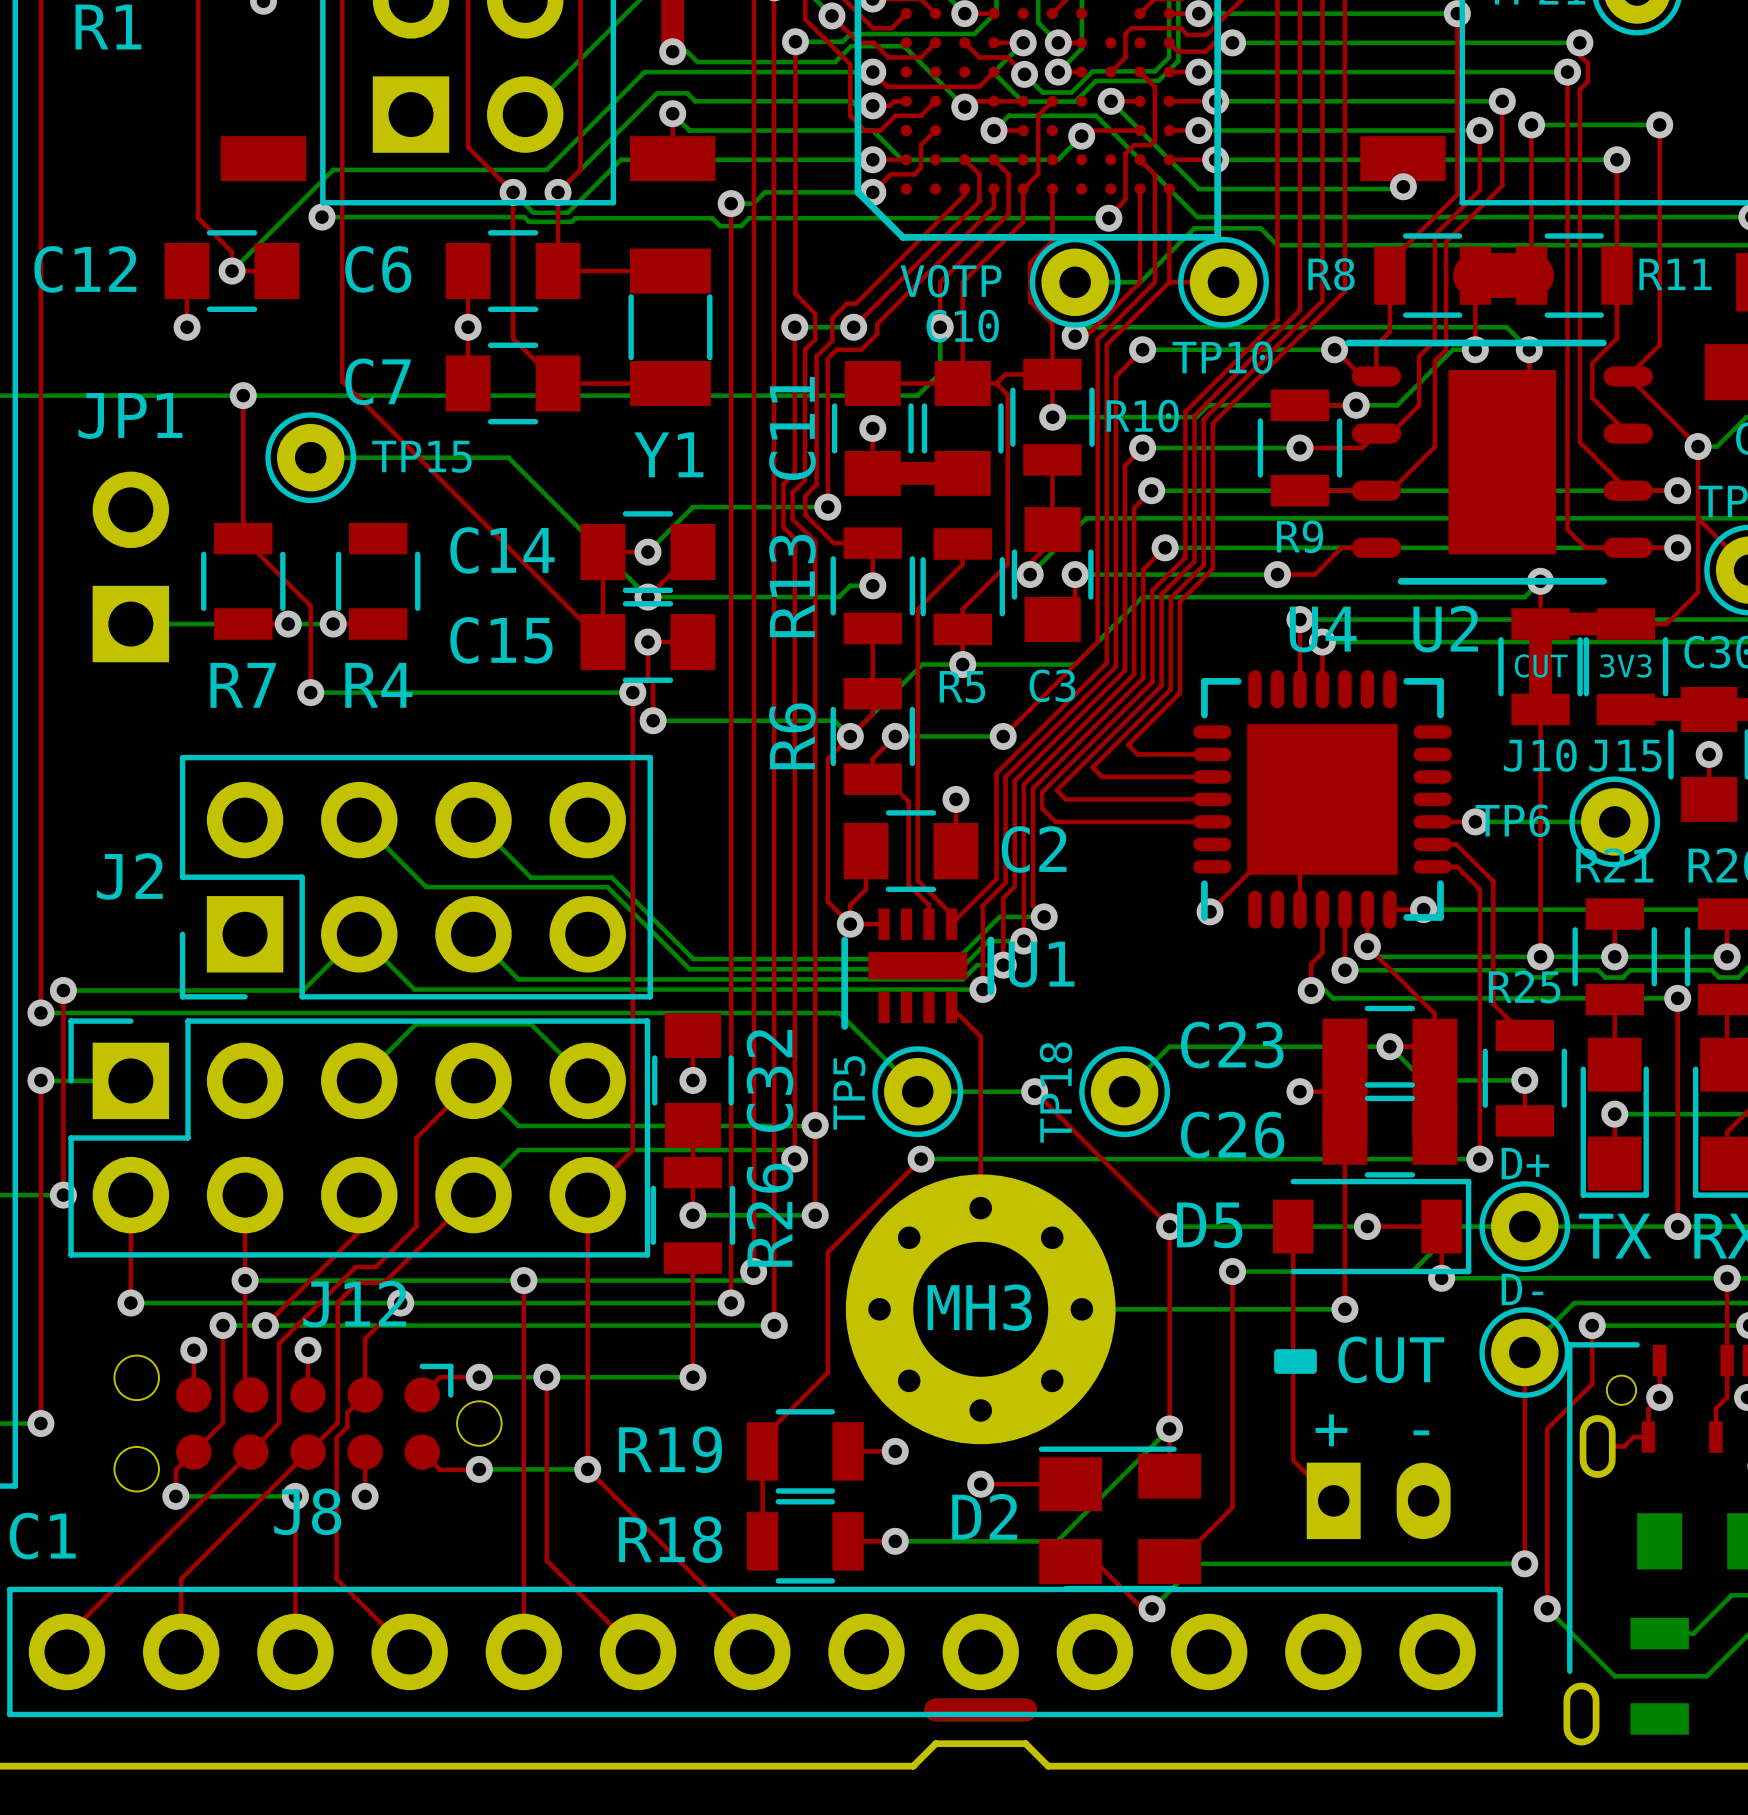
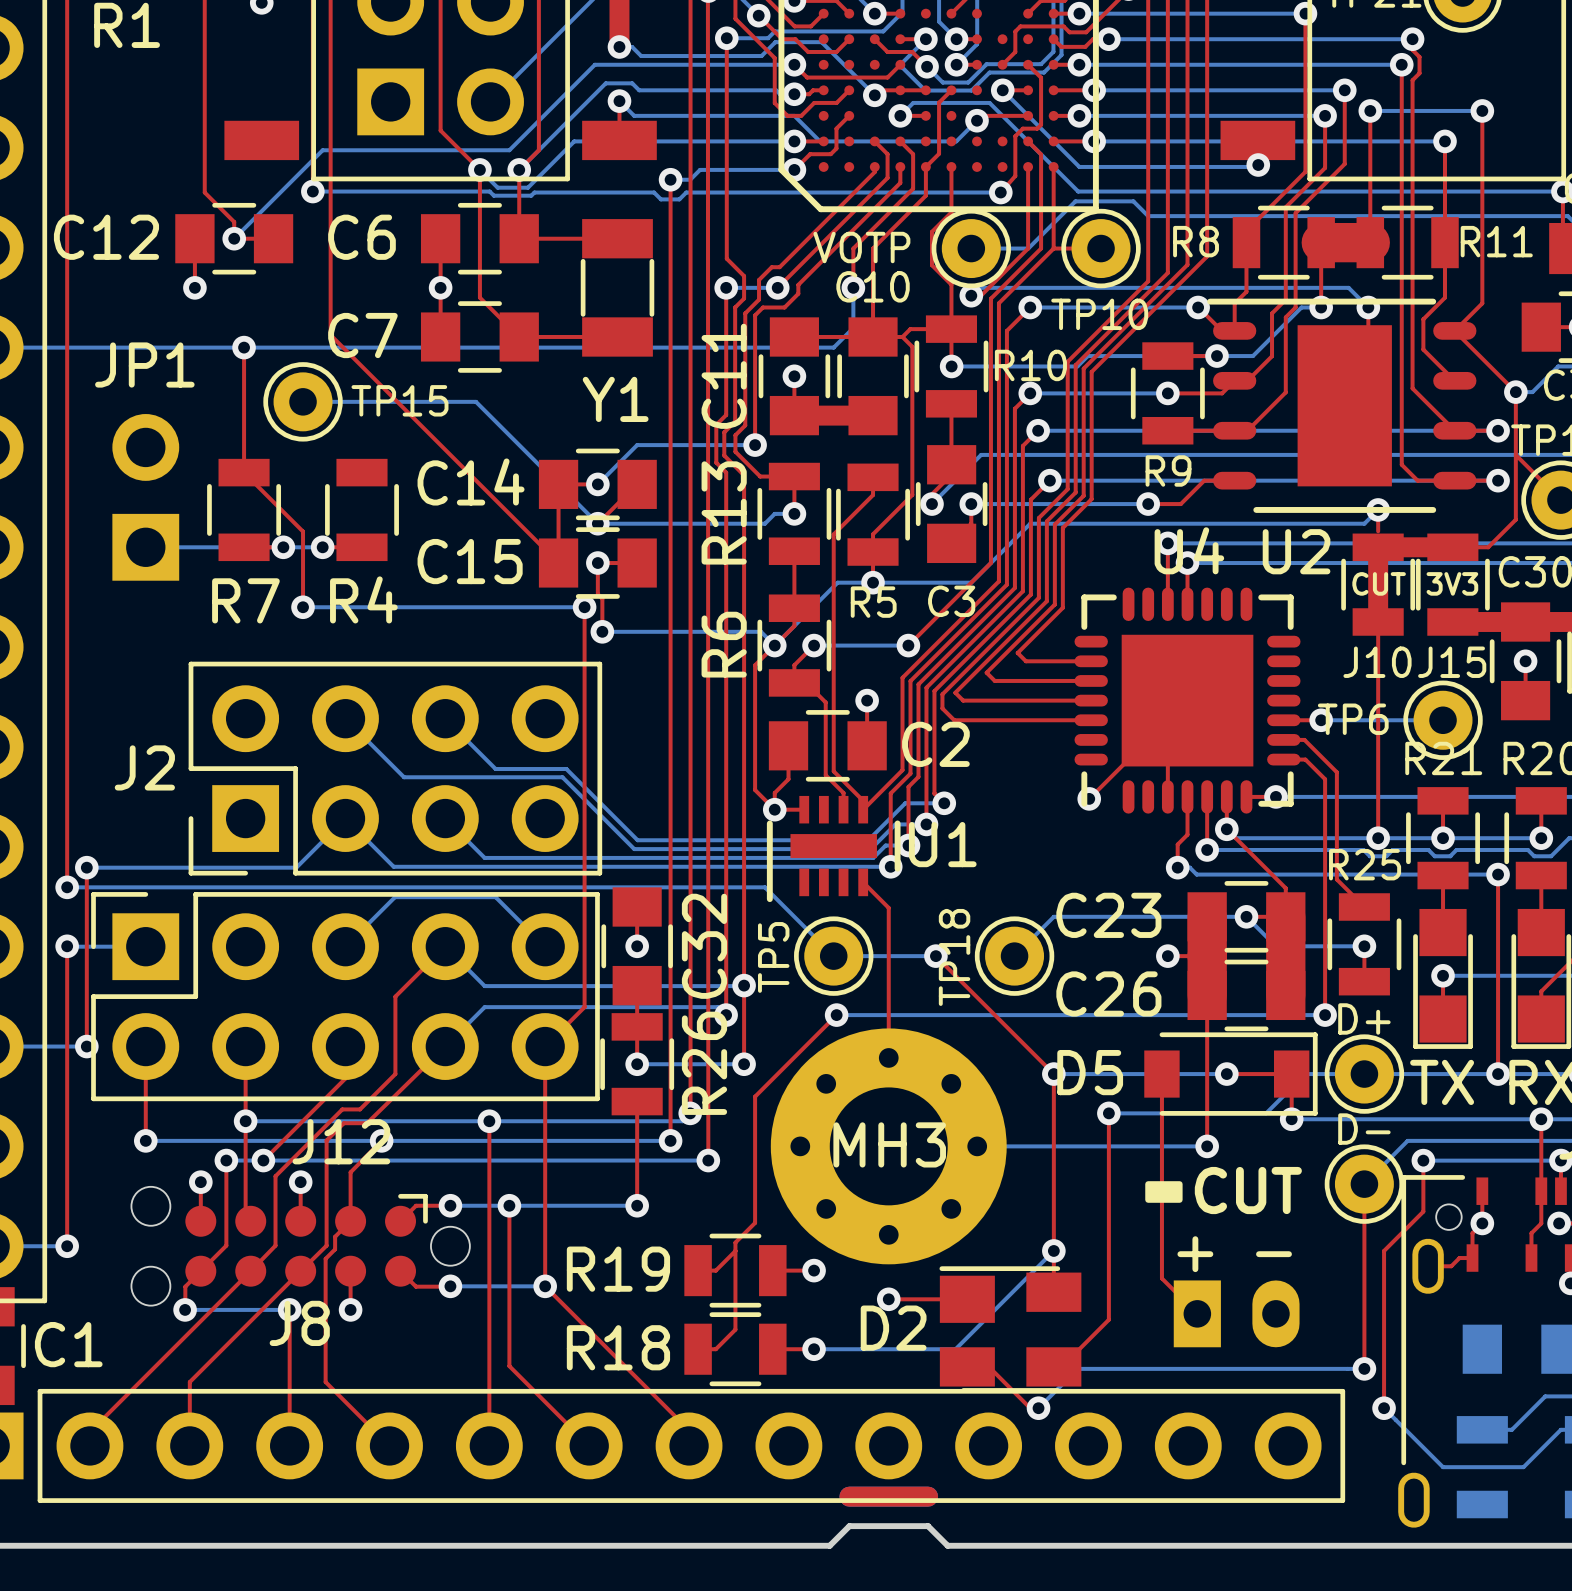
top track: (827, 1372) (762, 1437) (762, 1541) -> (755, 1201) (755, 1222) (735, 1242) (735, 1329) (715, 1349) (698, 1349)
top track: none -> (735, 1251) (715, 1270) (698, 1270)

